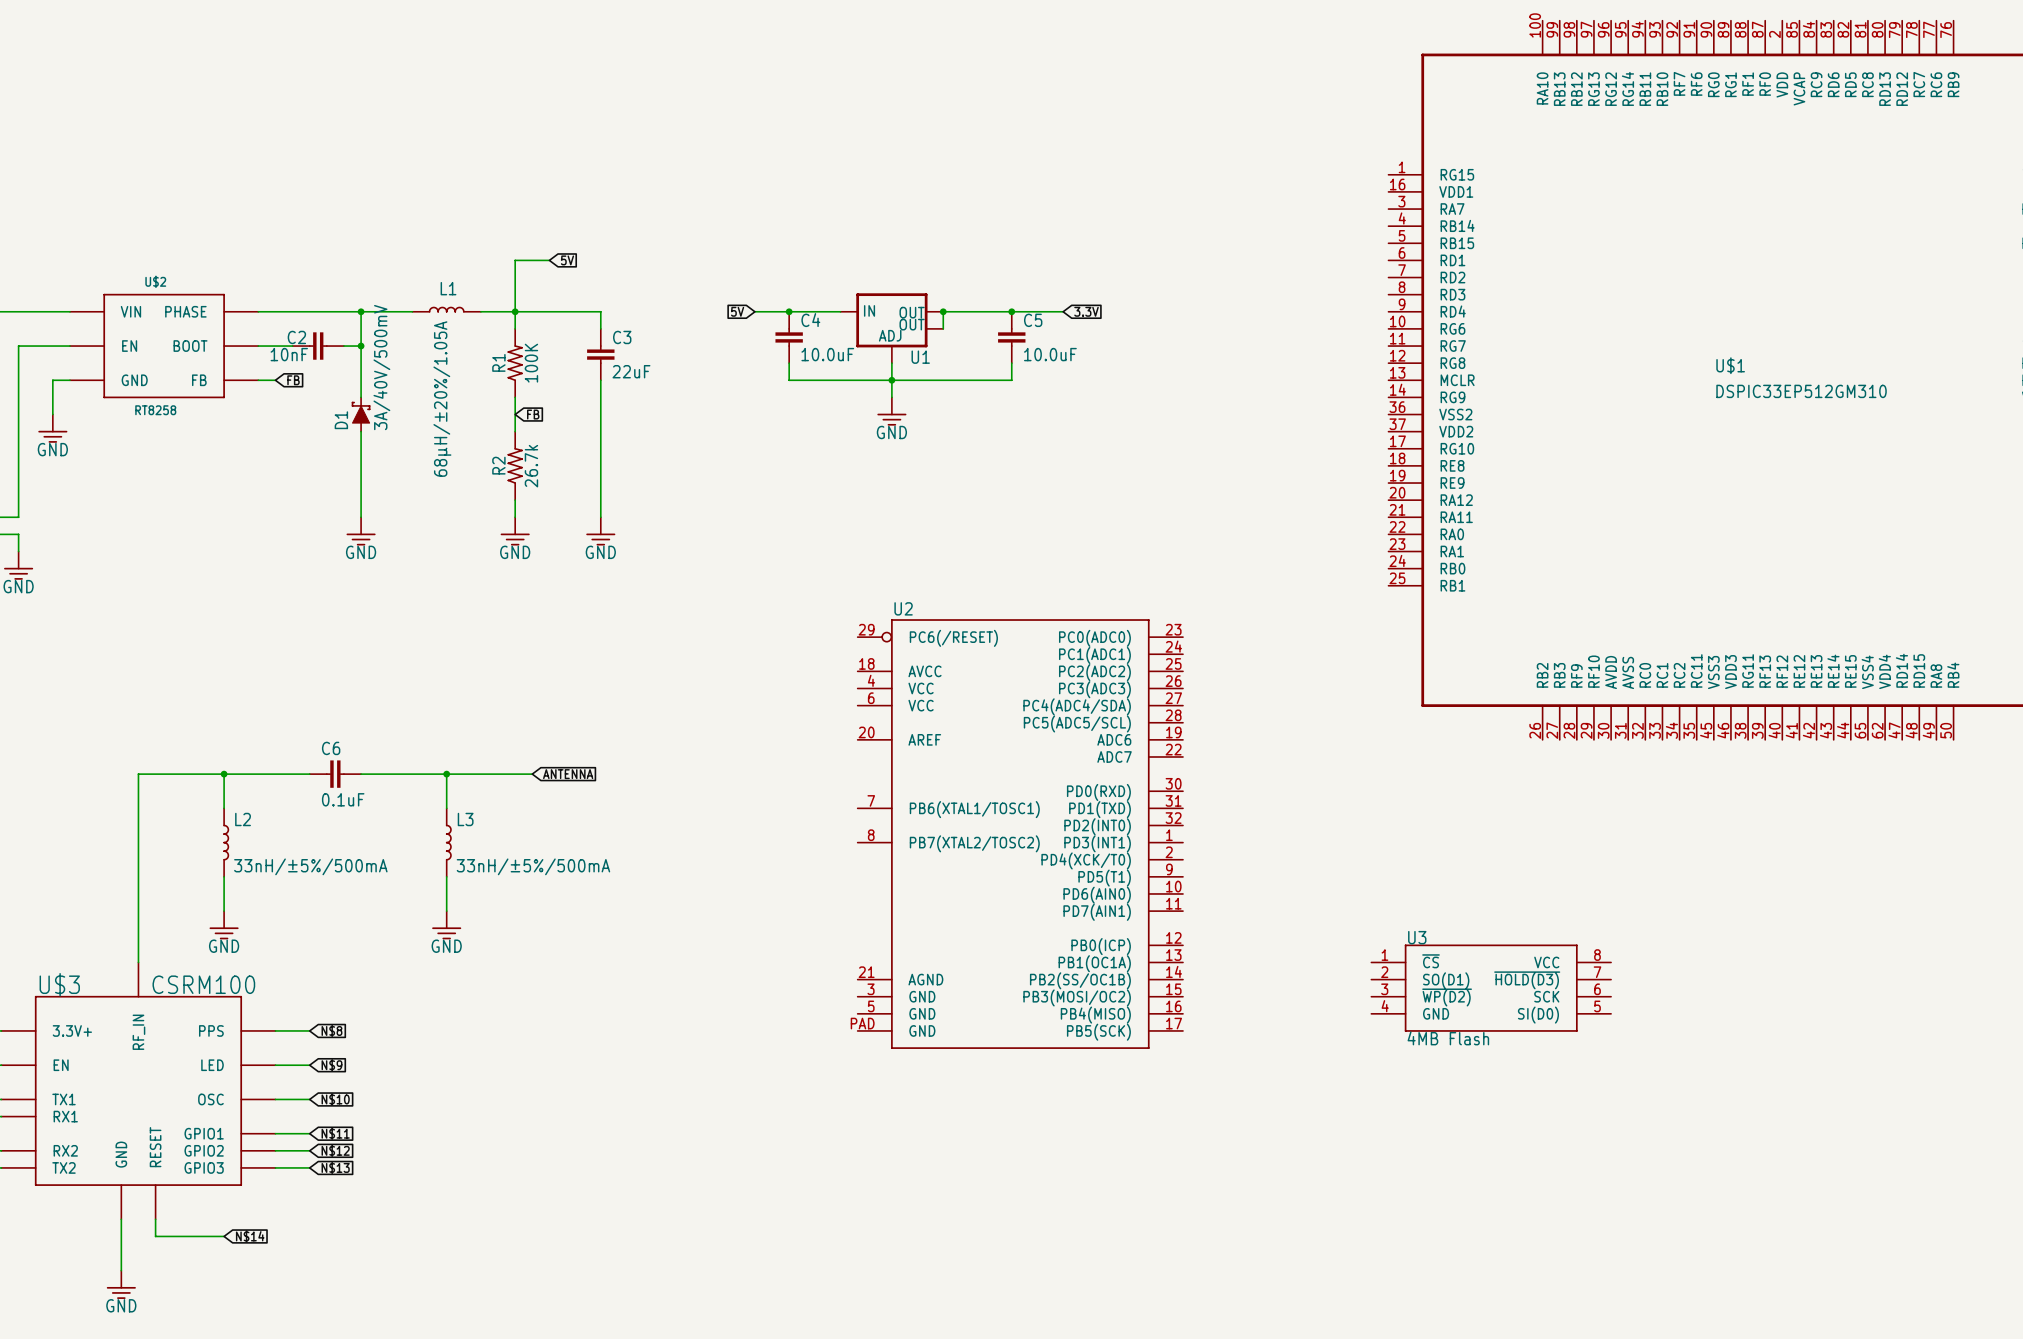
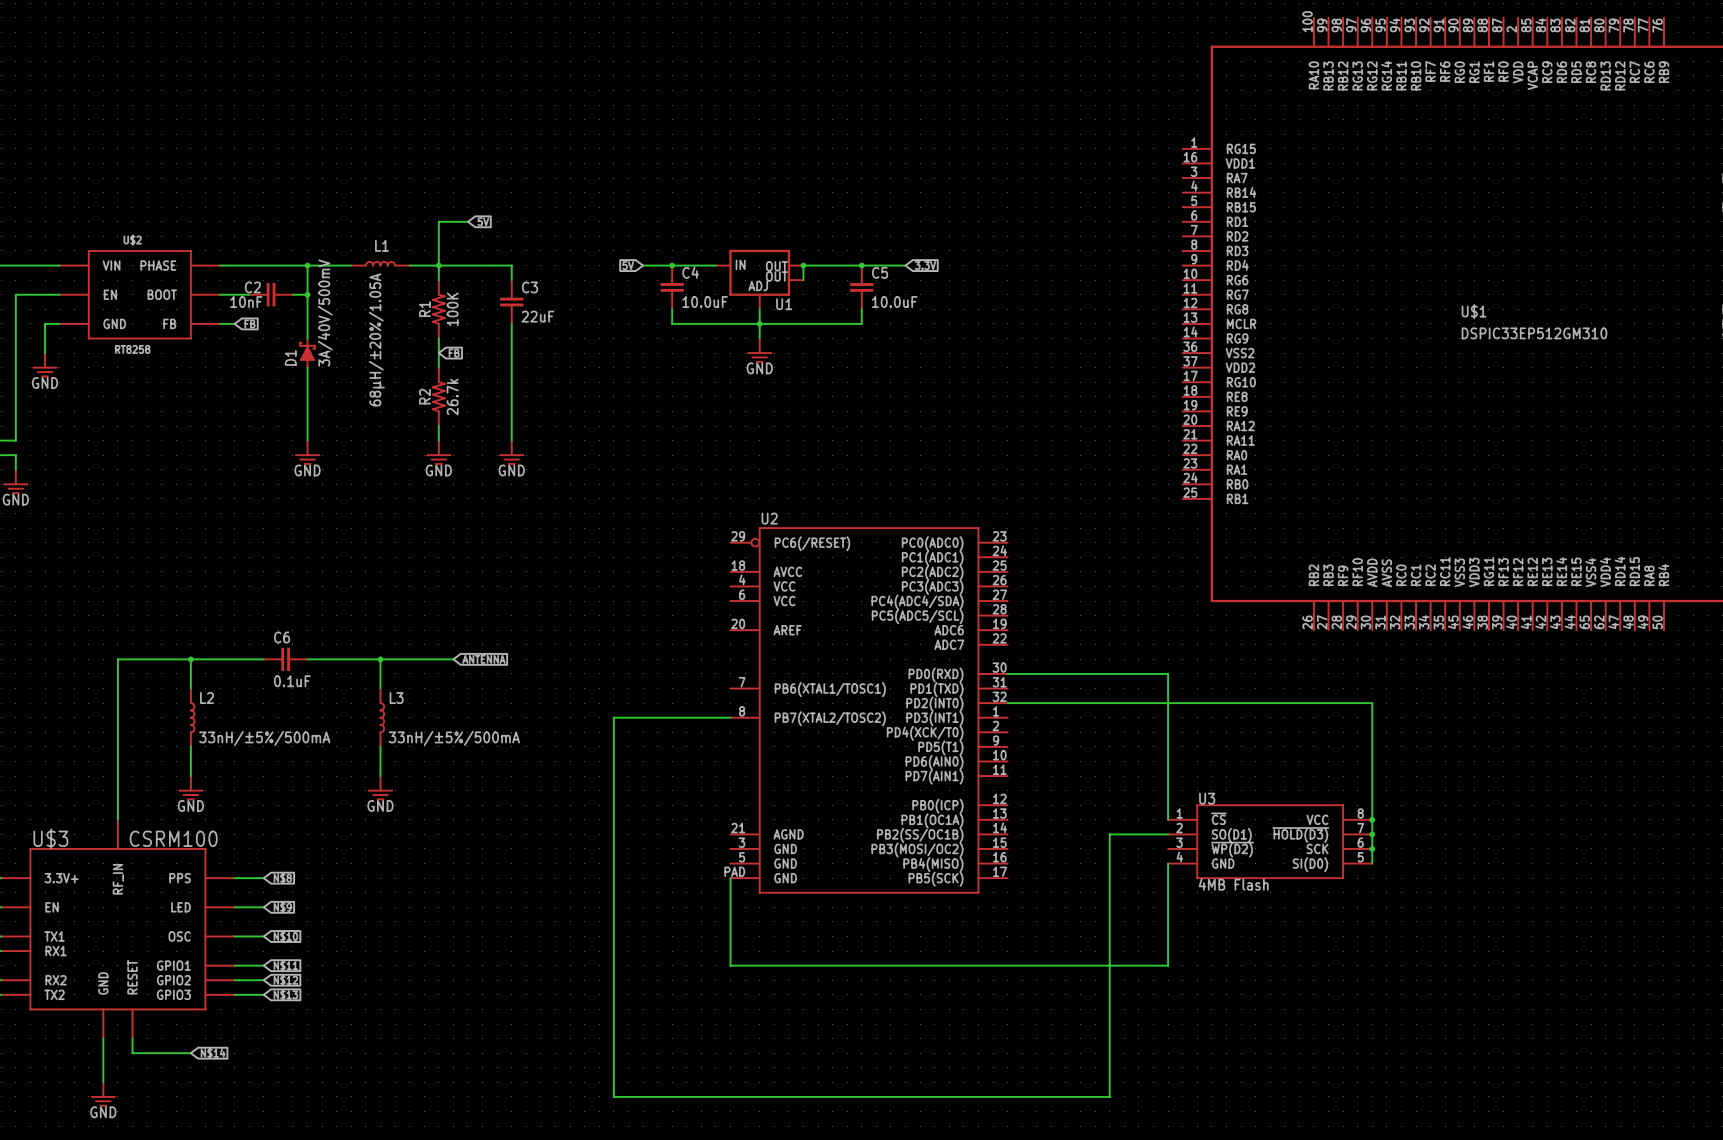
wire: none -> (1007, 673) (1168, 673) (1168, 819)
wire: none -> (1007, 703) (1372, 703) (1372, 863)
wire: none -> (730, 717) (613, 717) (613, 1096) (1109, 1096) (1109, 834) (1168, 834)
junction: none -> (1372, 819)
junction: none -> (1372, 834)
junction: none -> (1372, 848)
wire: none -> (1168, 863) (1168, 965) (730, 965) (730, 878)

